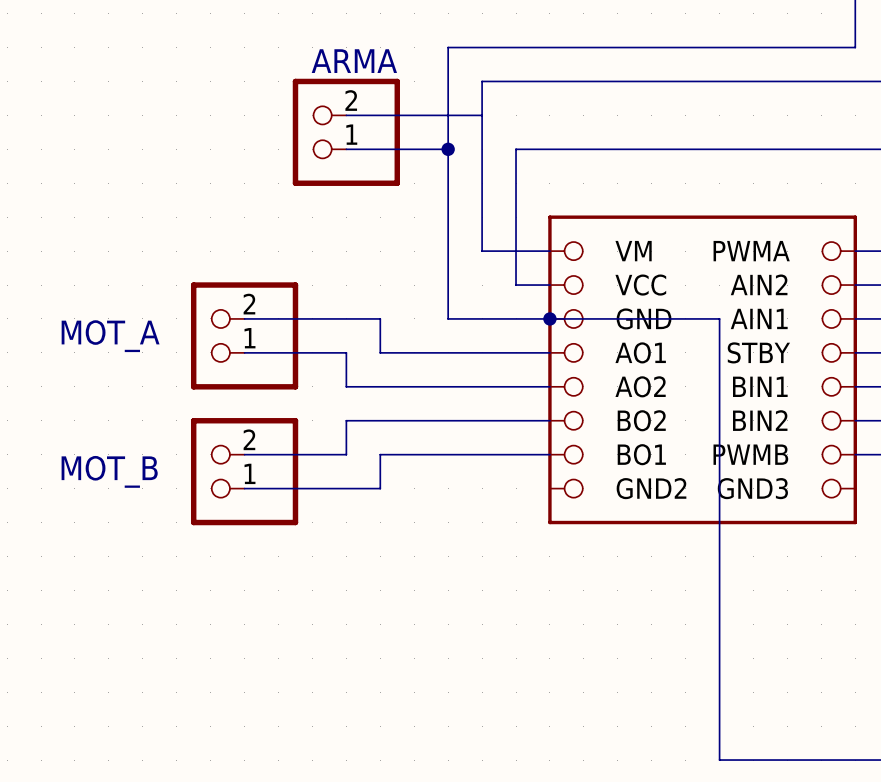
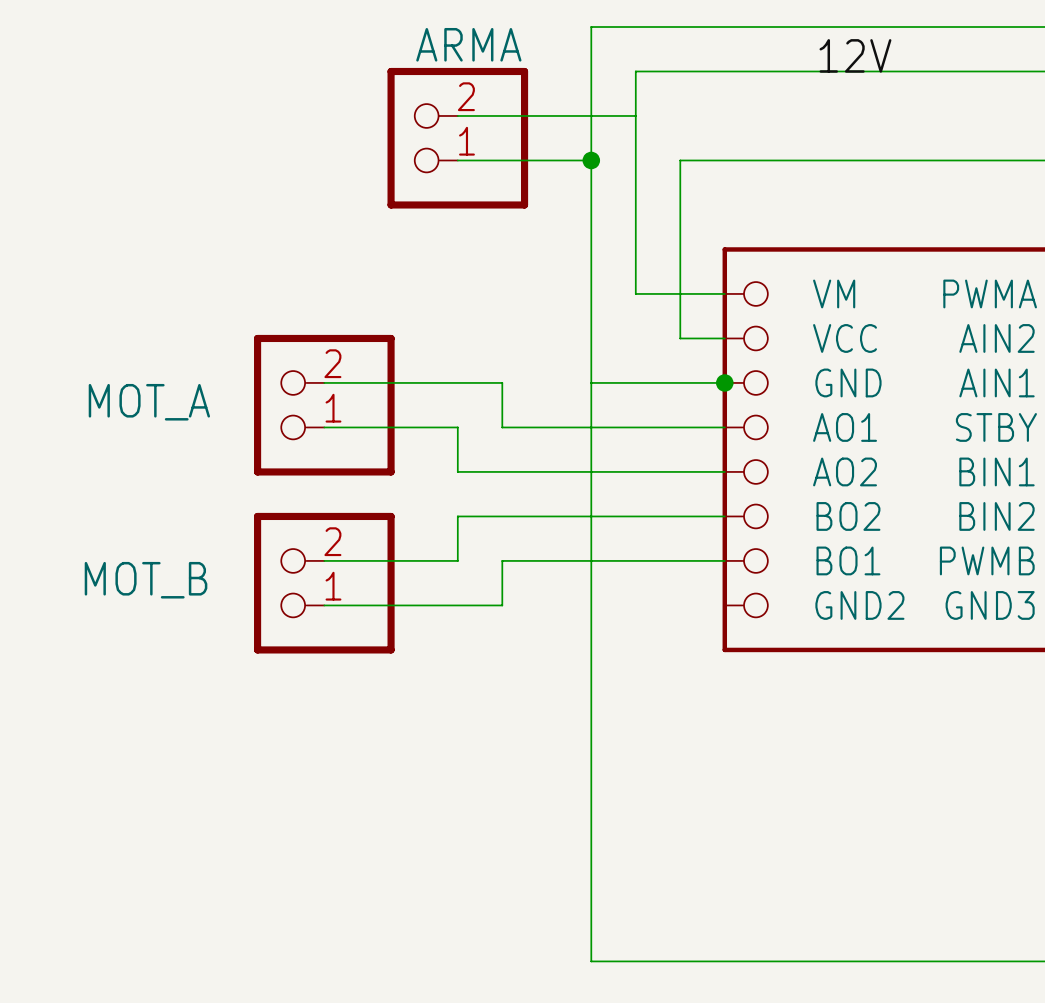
label: none -> 12V (855, 55)
wire: (549, 318) (719, 318) (719, 760) -> (591, 382) (591, 961) (947, 961)

